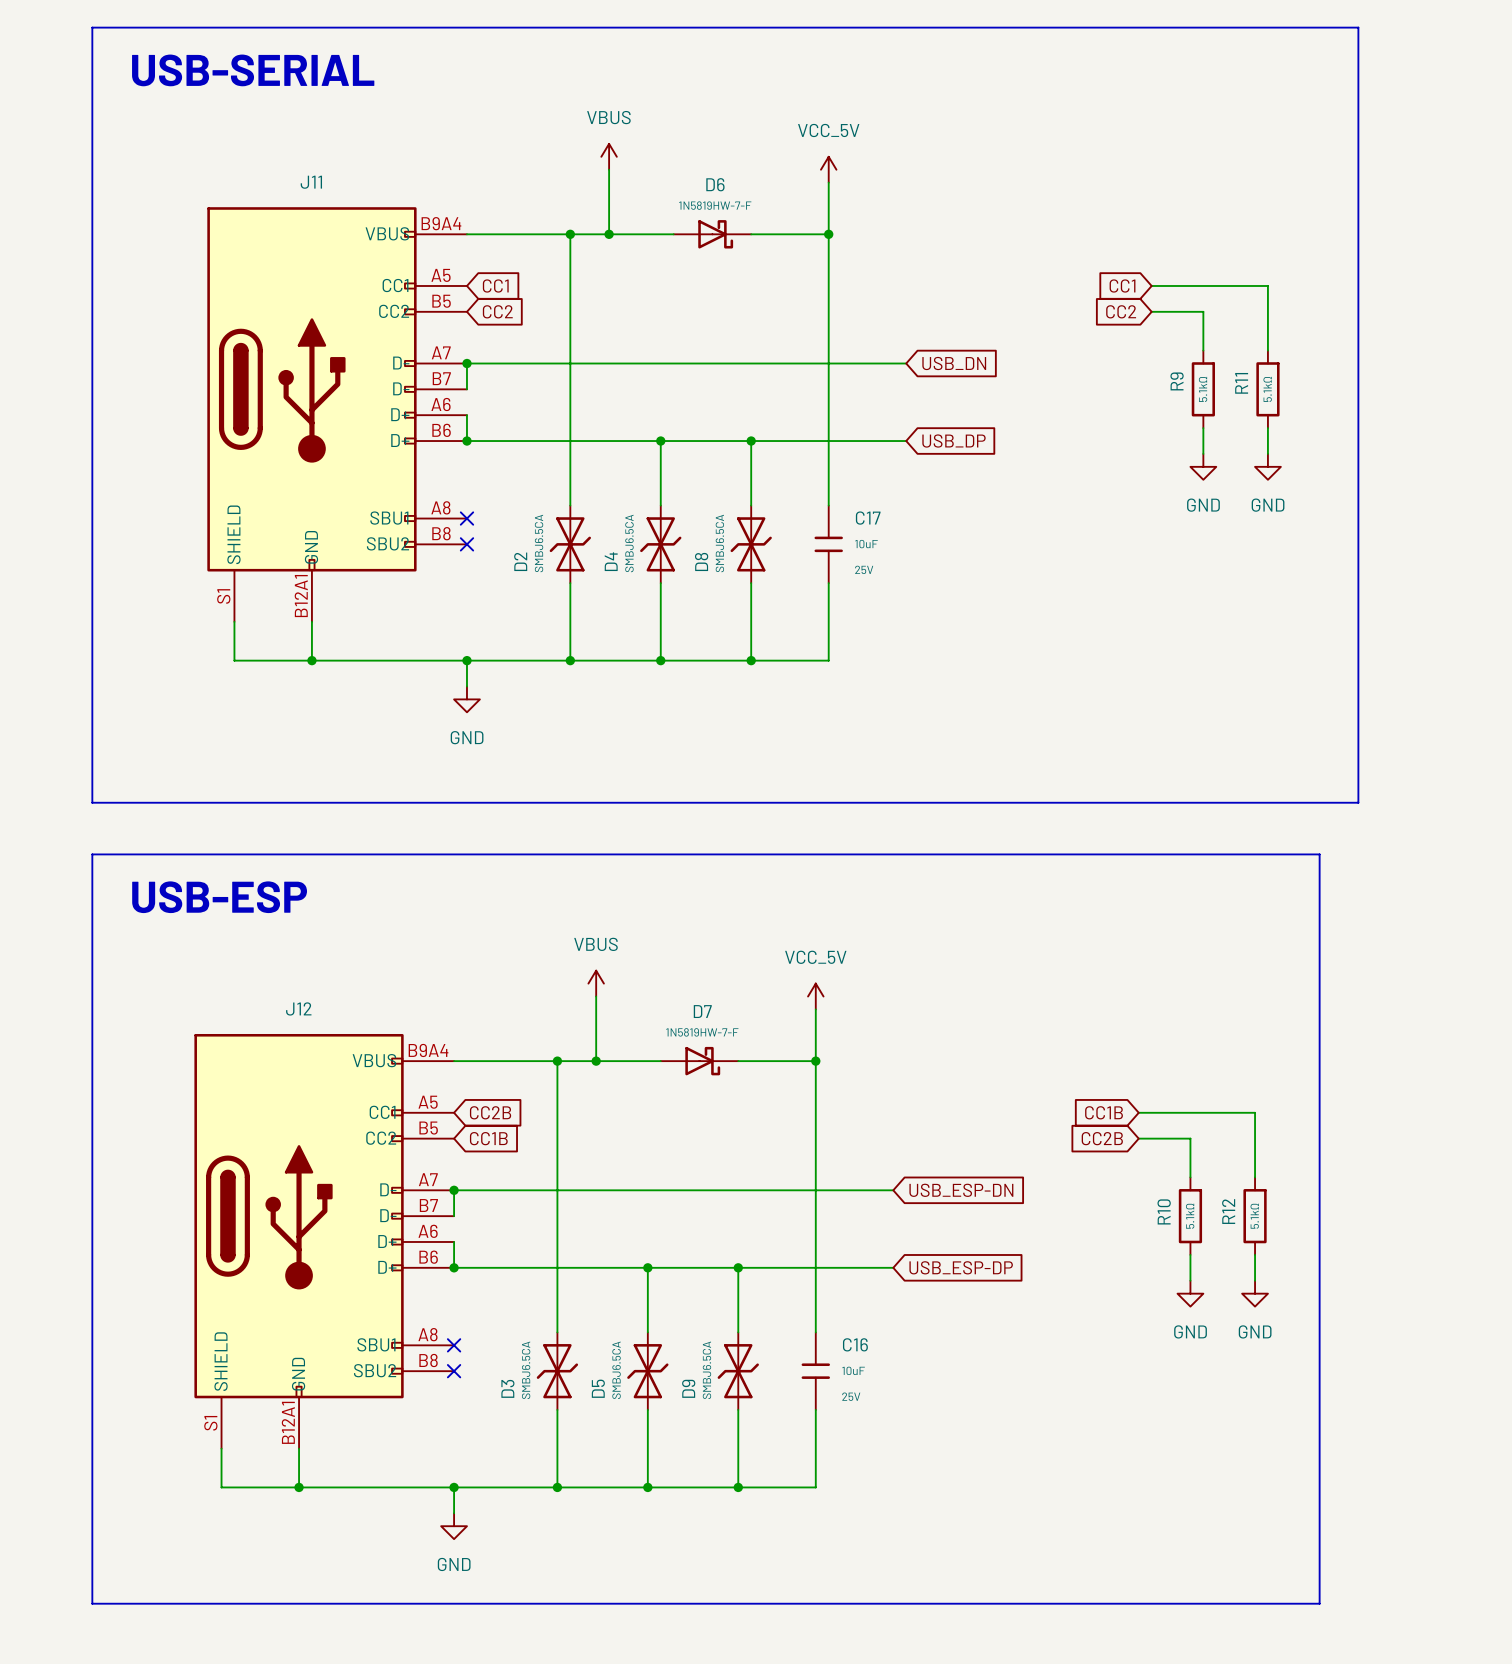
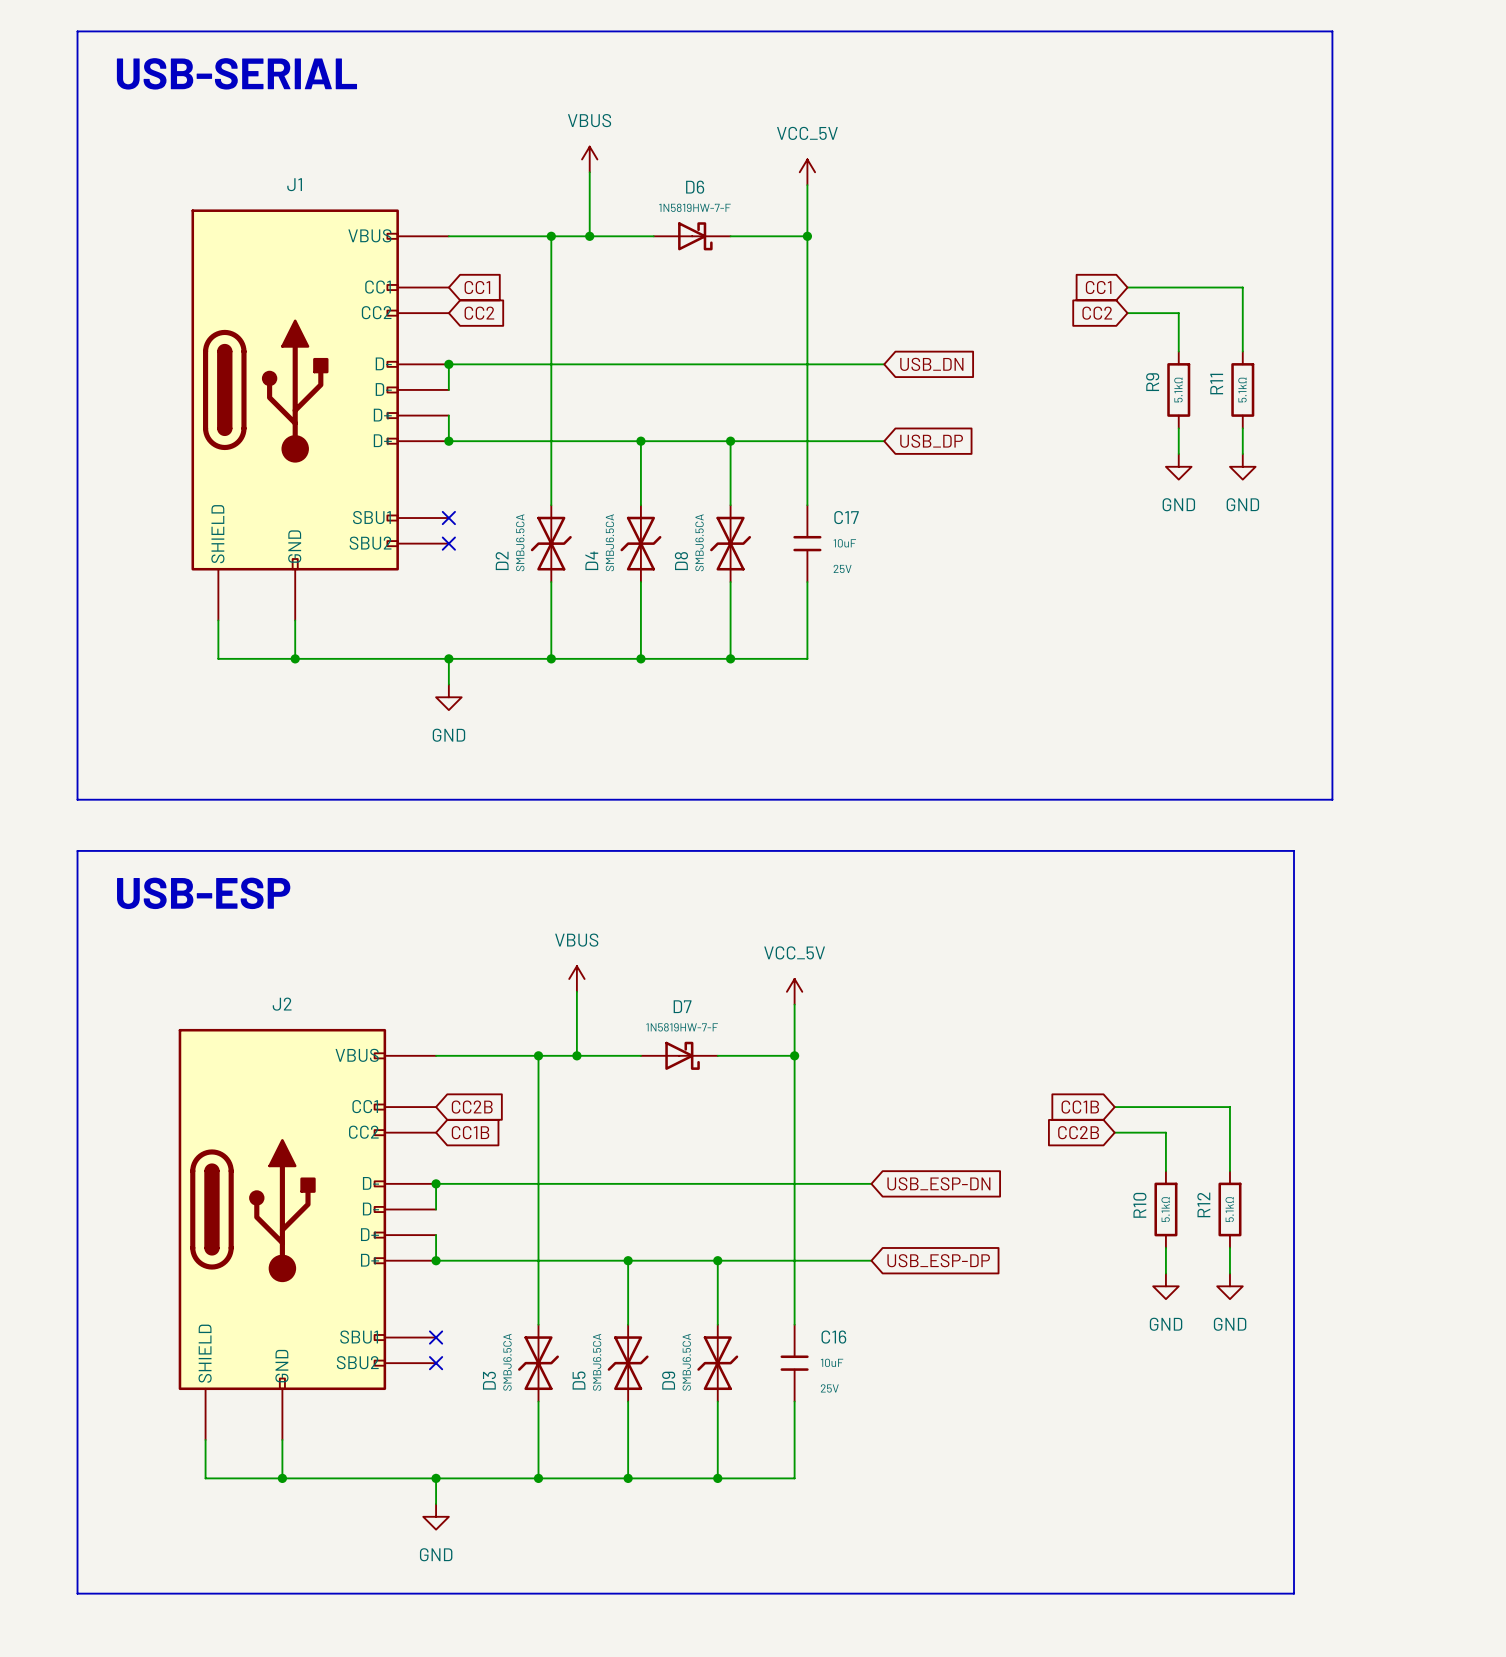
J11 name: J11 (311, 182) -> J1 (294, 184)
J11 symbol: [207, 207, 467, 622] -> [191, 209, 449, 621]
J12 name: J12 (298, 1008) -> J2 (282, 1004)
J12 symbol: [194, 1033, 455, 1449] -> [178, 1028, 437, 1440]

